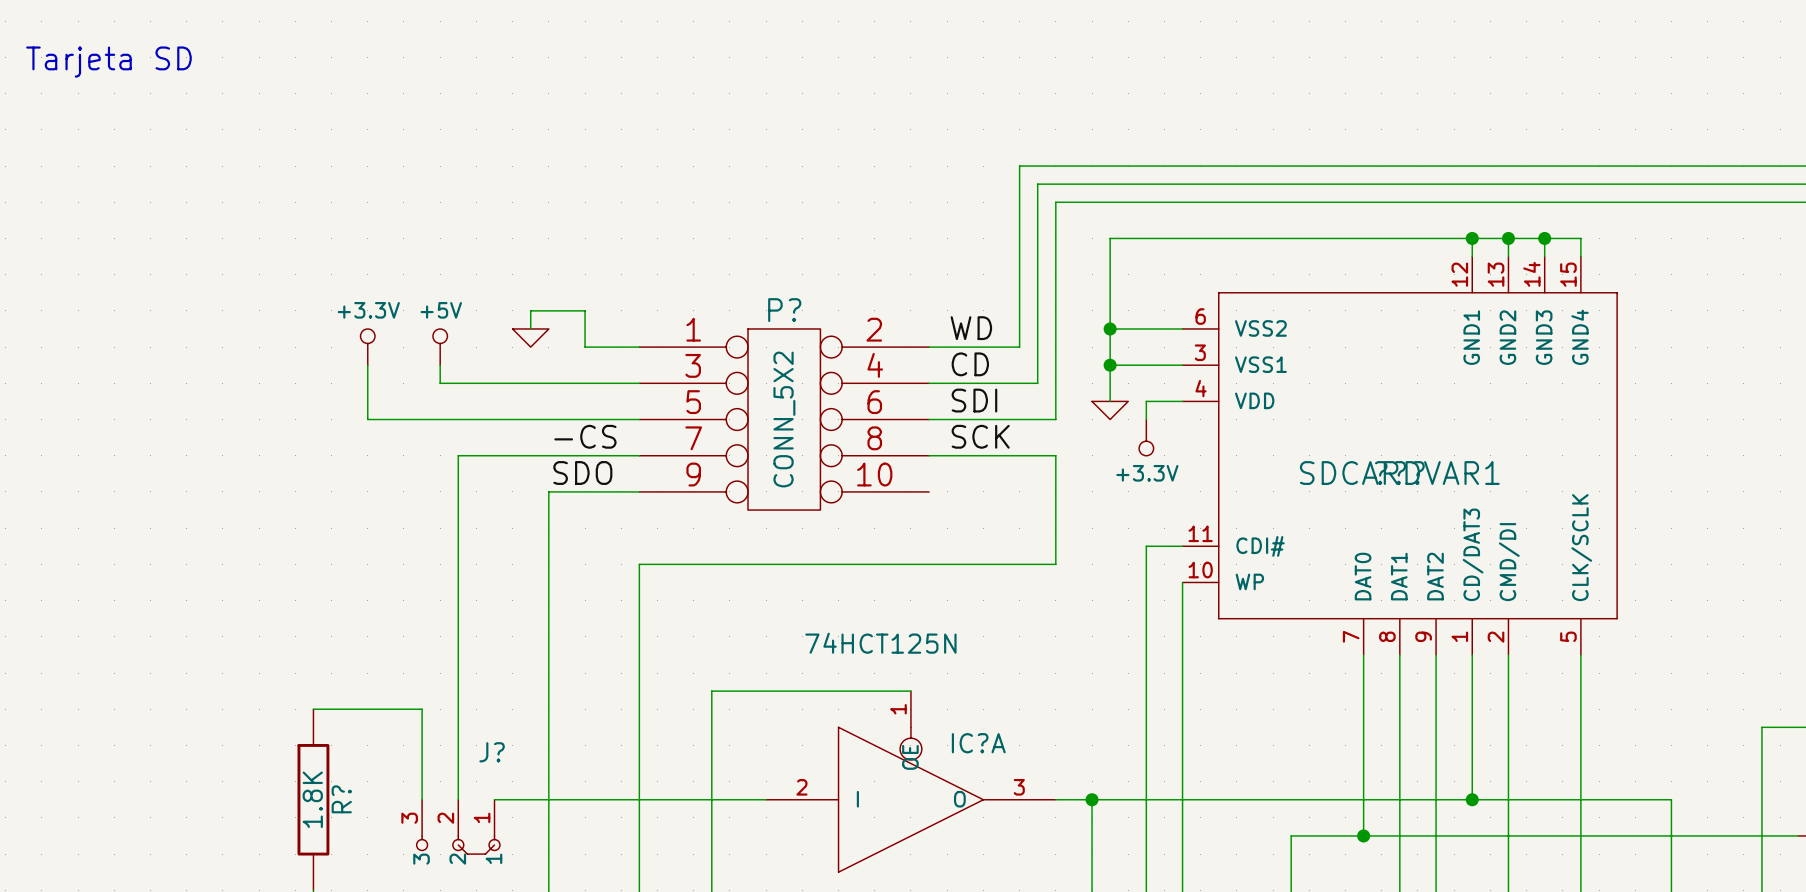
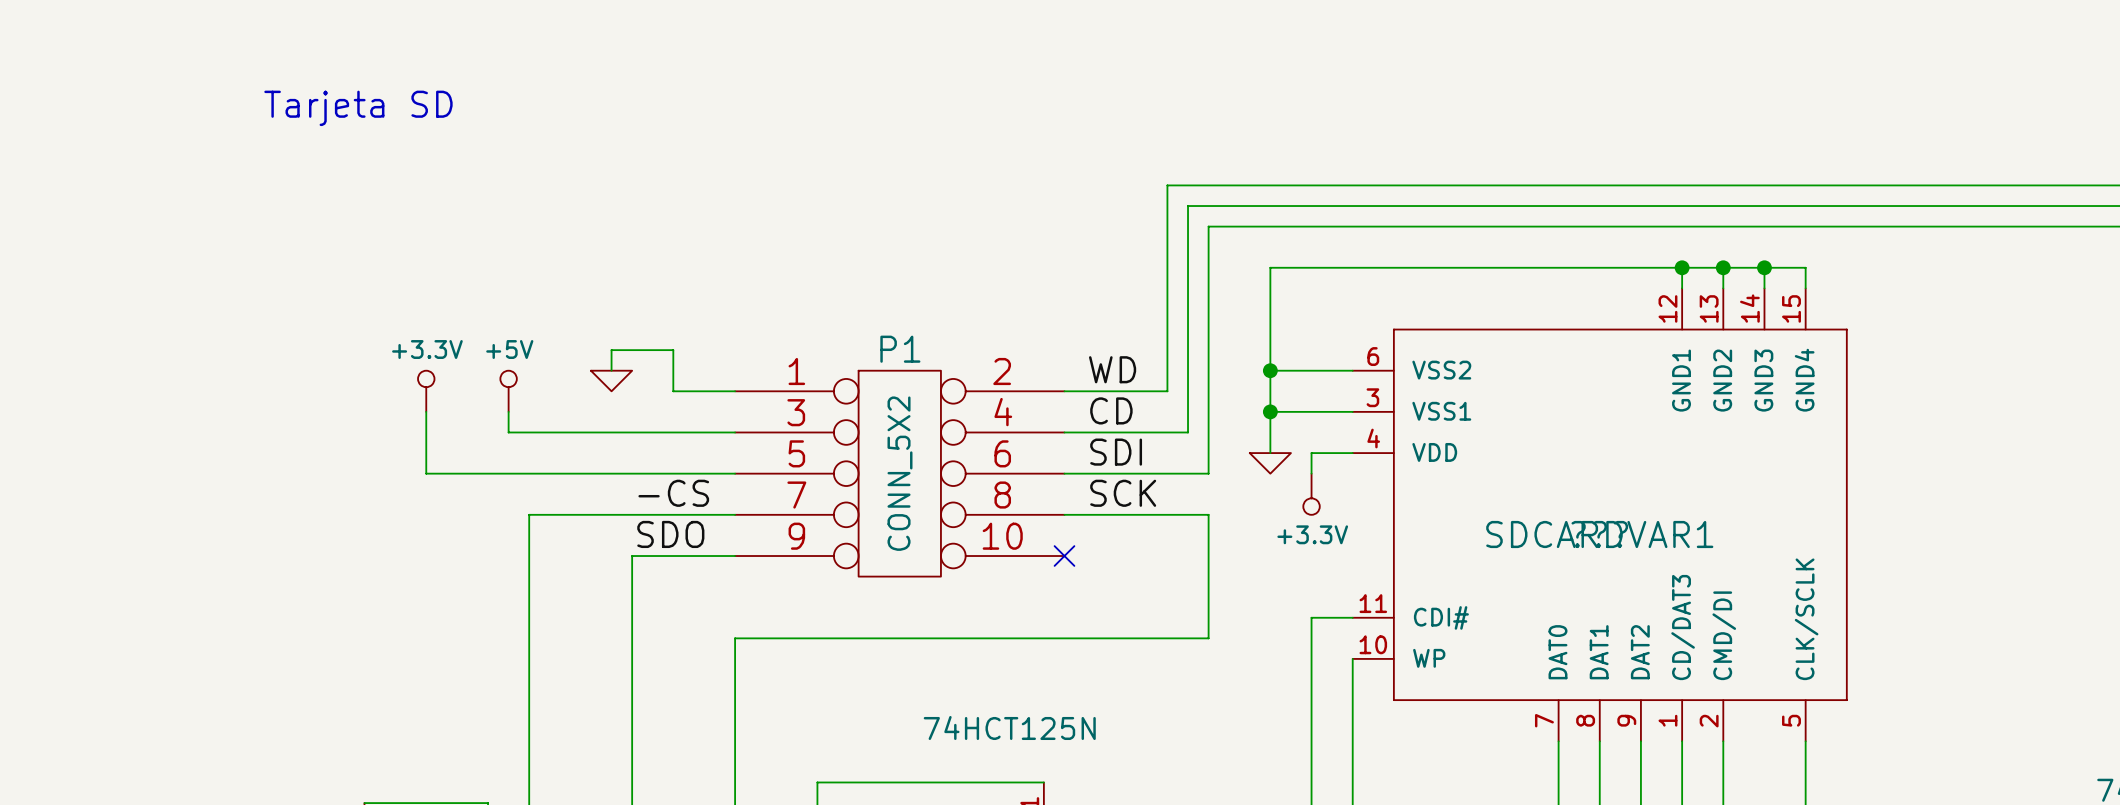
text position: Tarjeta SD (108, 62) -> Tarjeta SD (358, 108)
P? name: P? (784, 310) -> P1 (900, 349)
no-connect mark: none -> (1064, 556)

